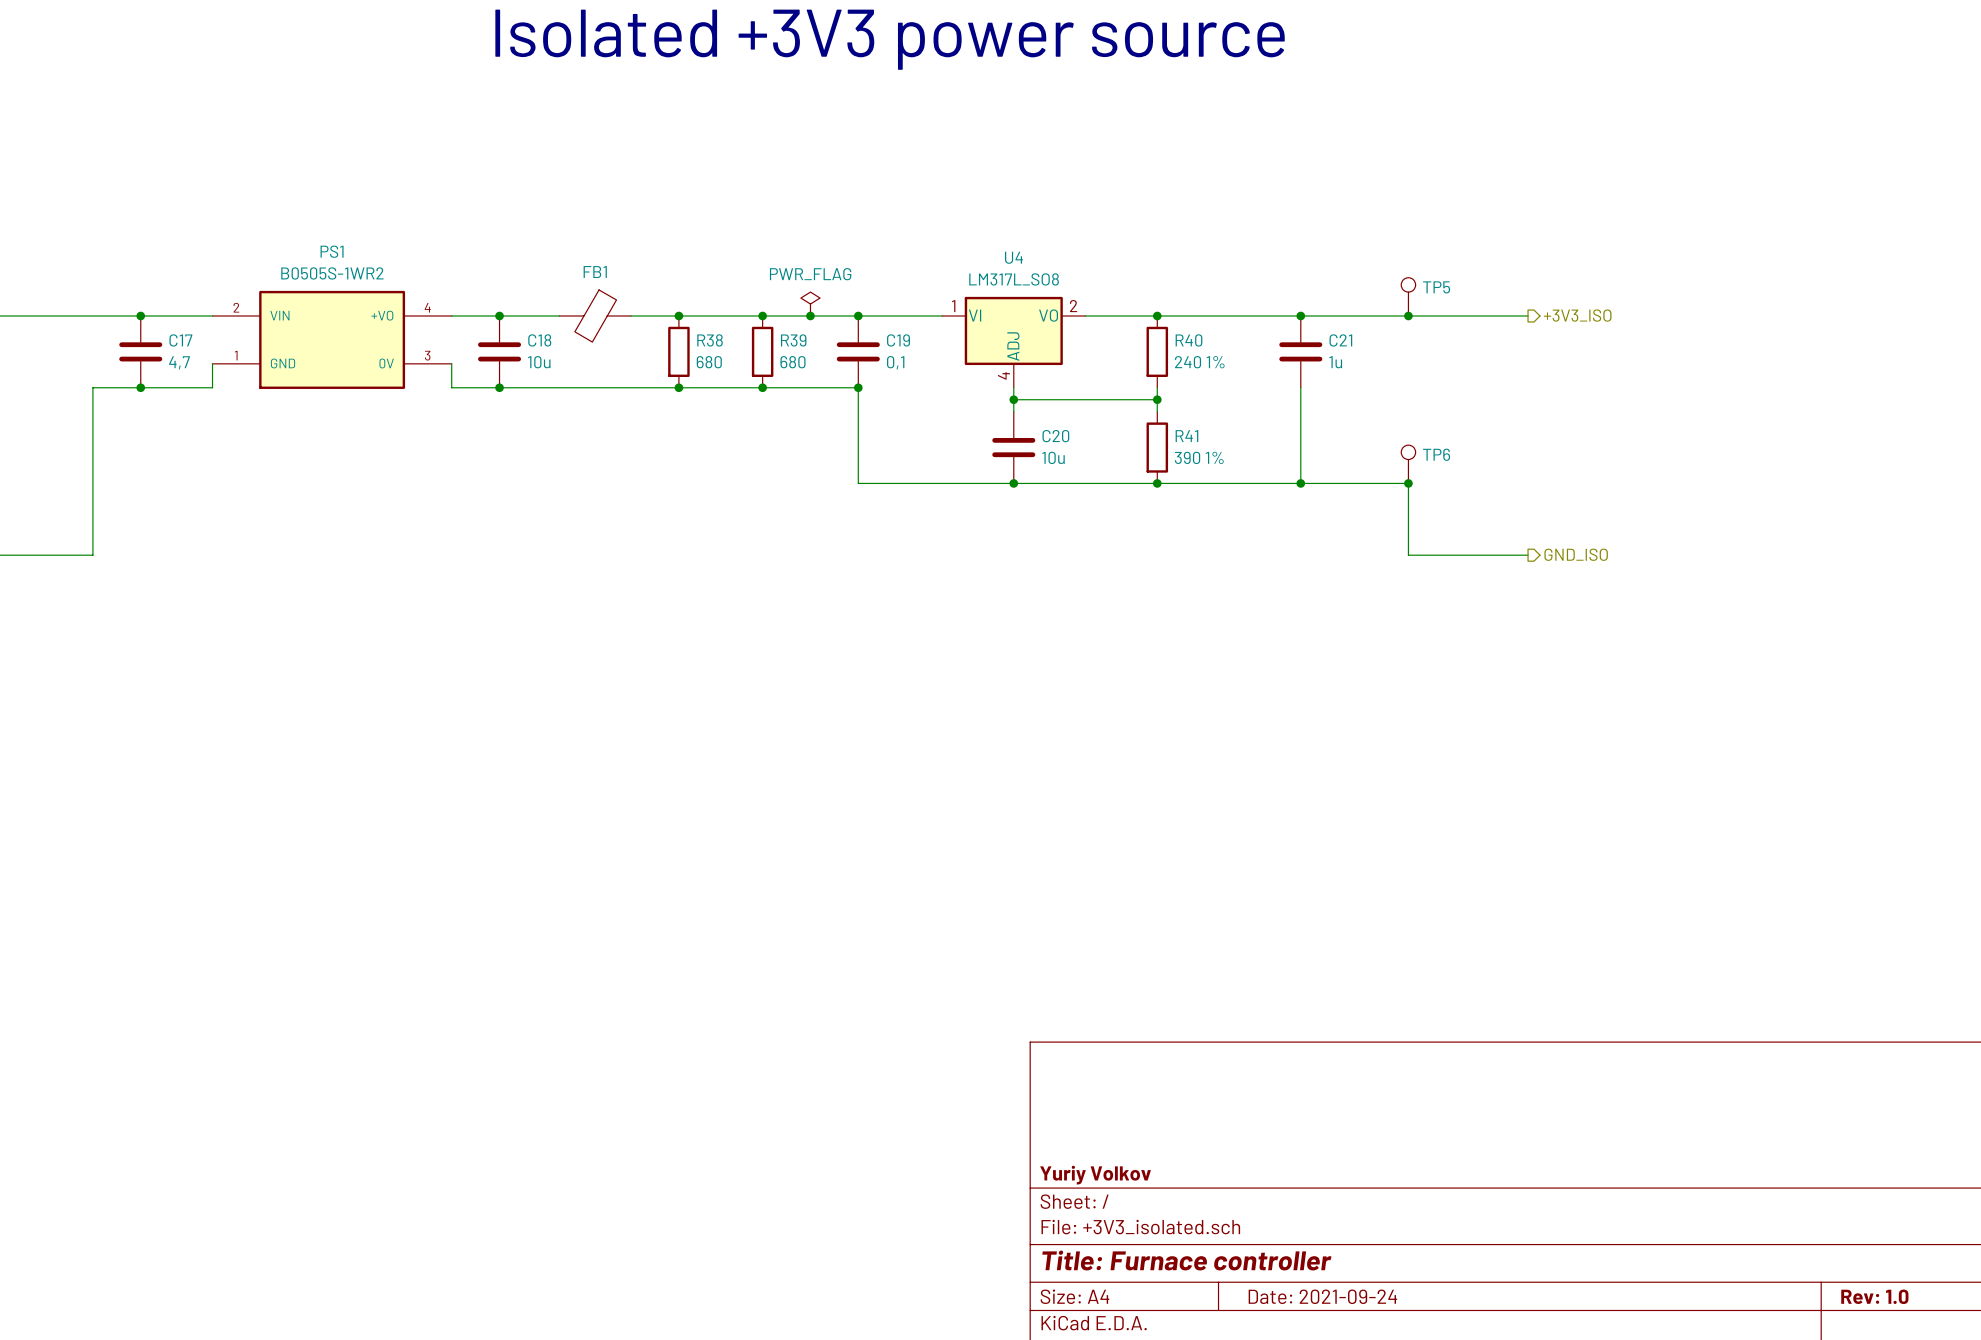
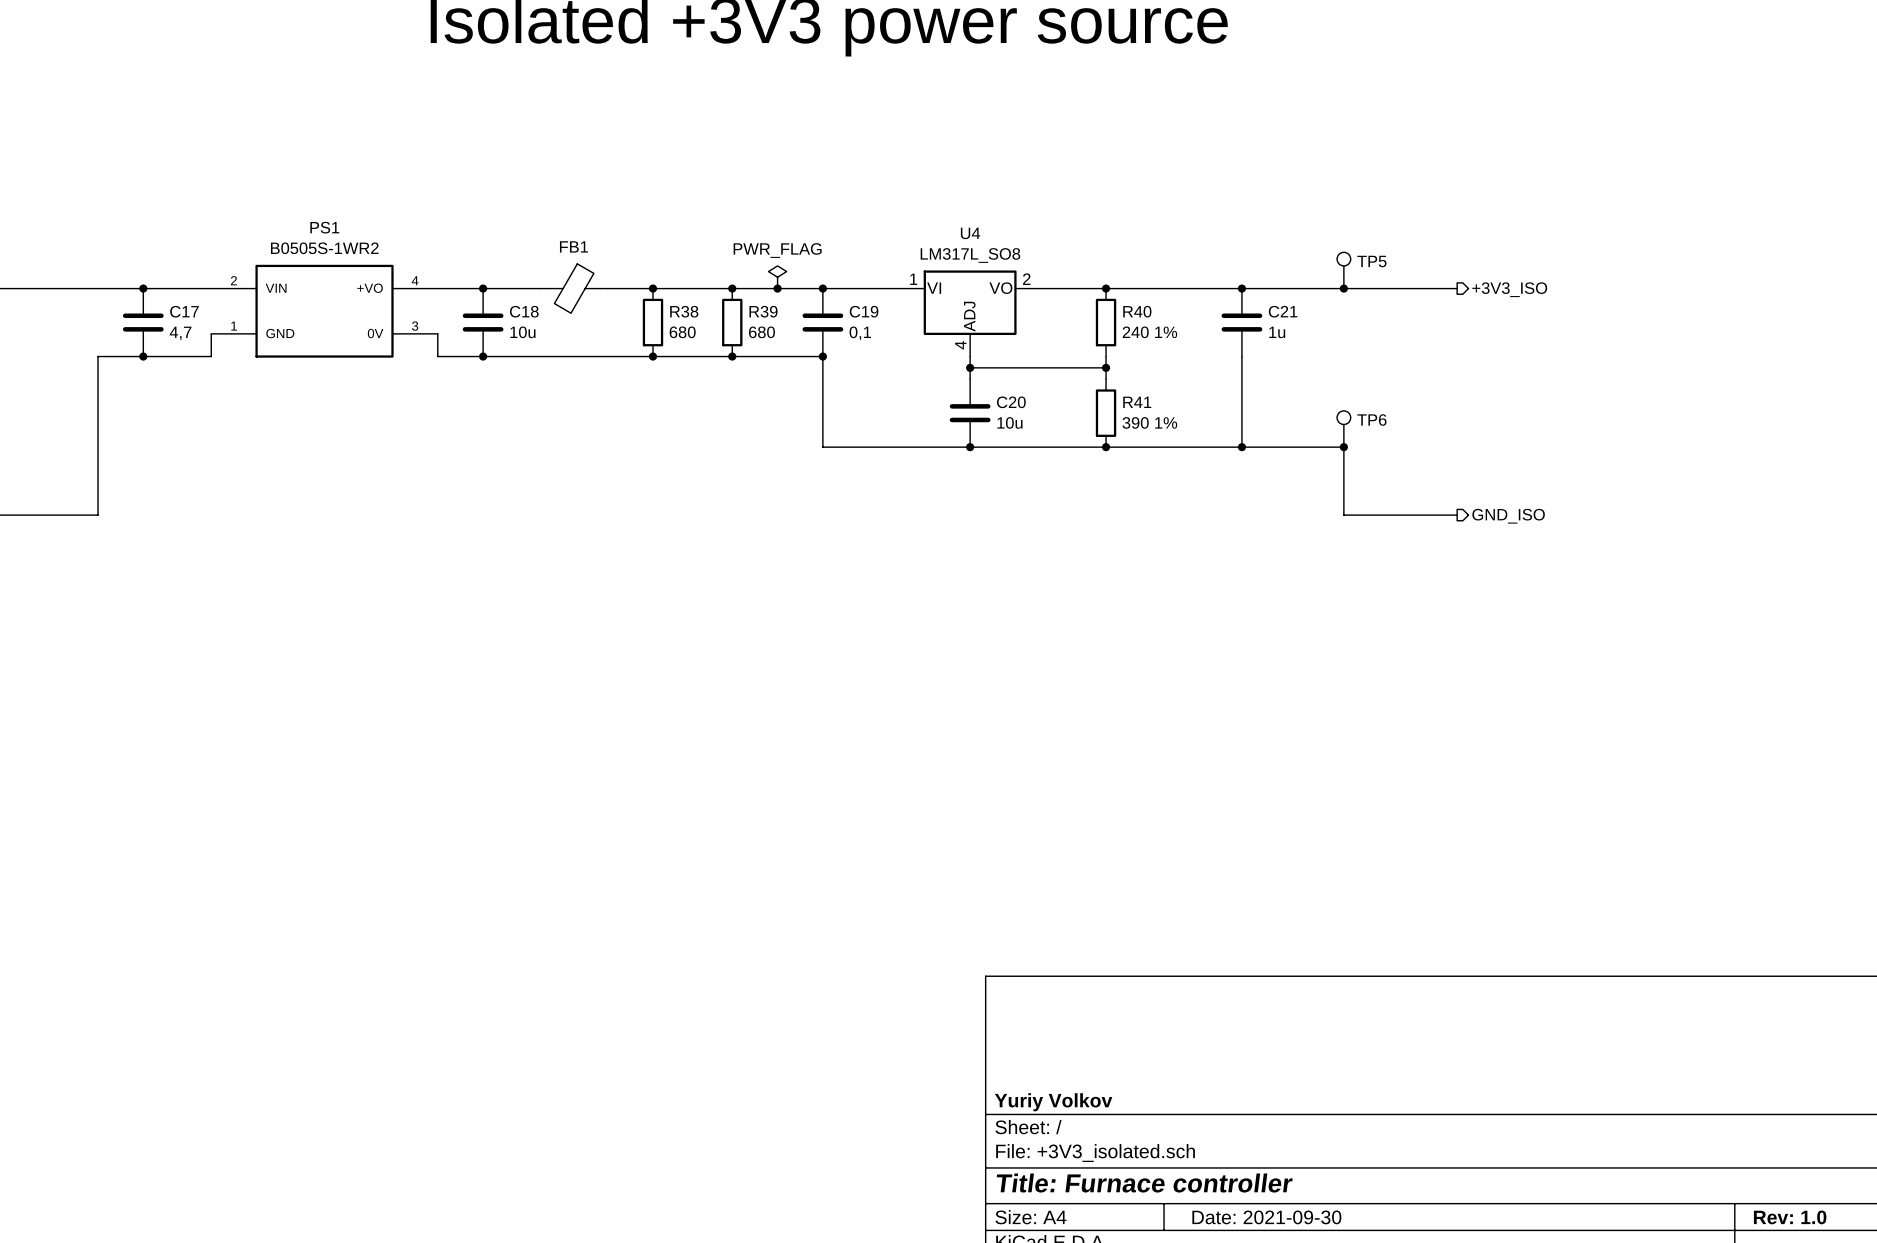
title block: Date: 2021-09-24 (1322, 1296) -> Date: 2021-09-30 (1266, 1217)

